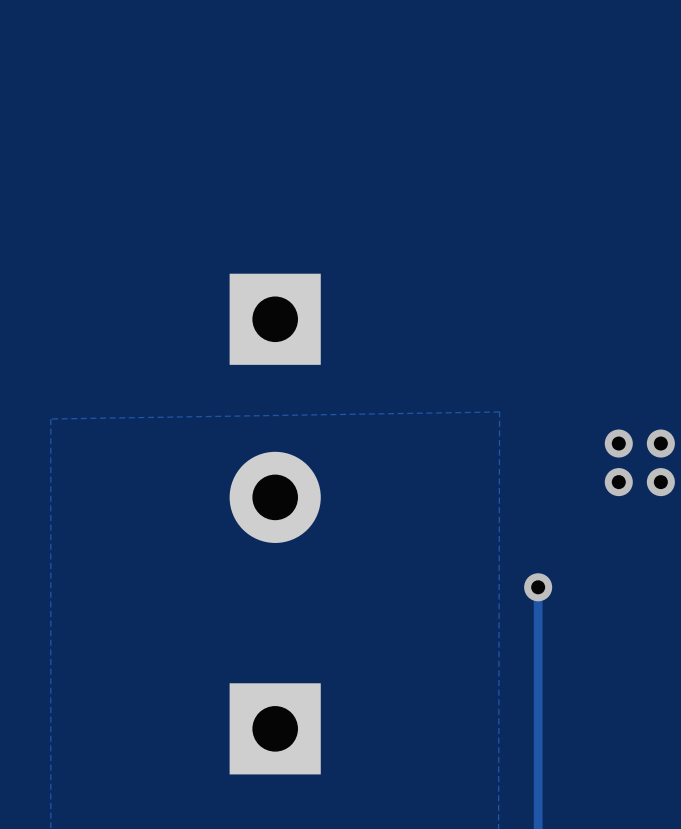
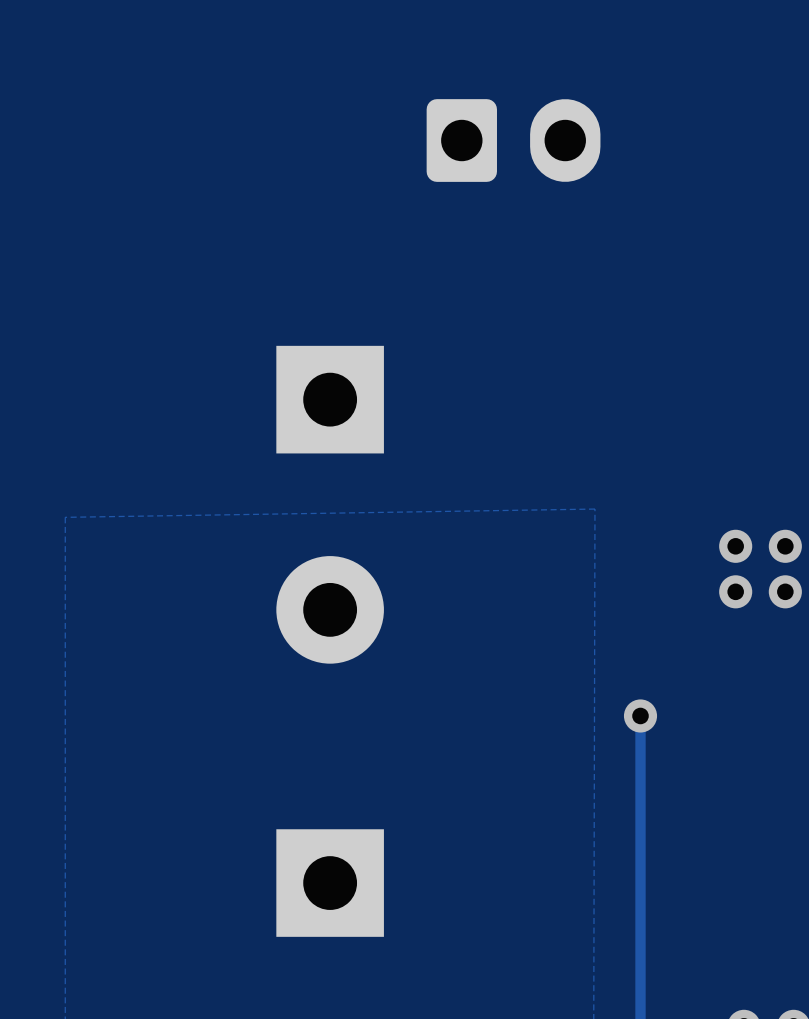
part: none -> (513, 140)

